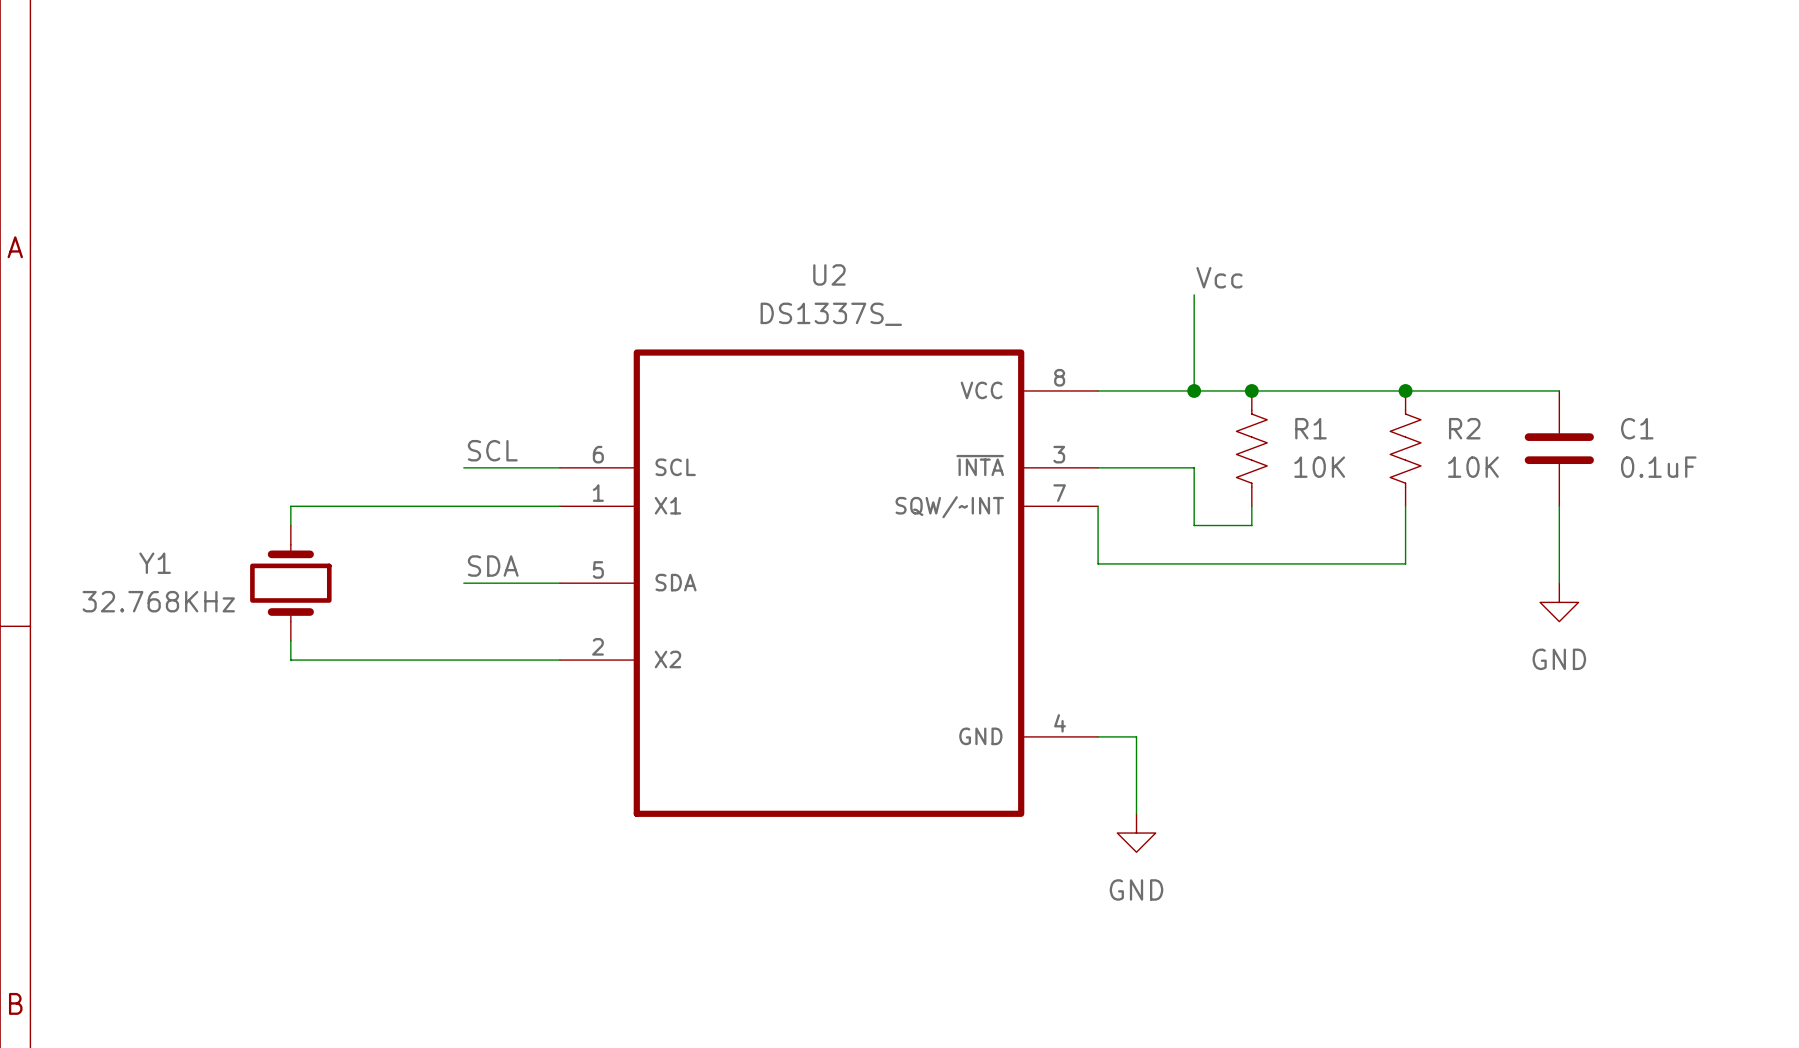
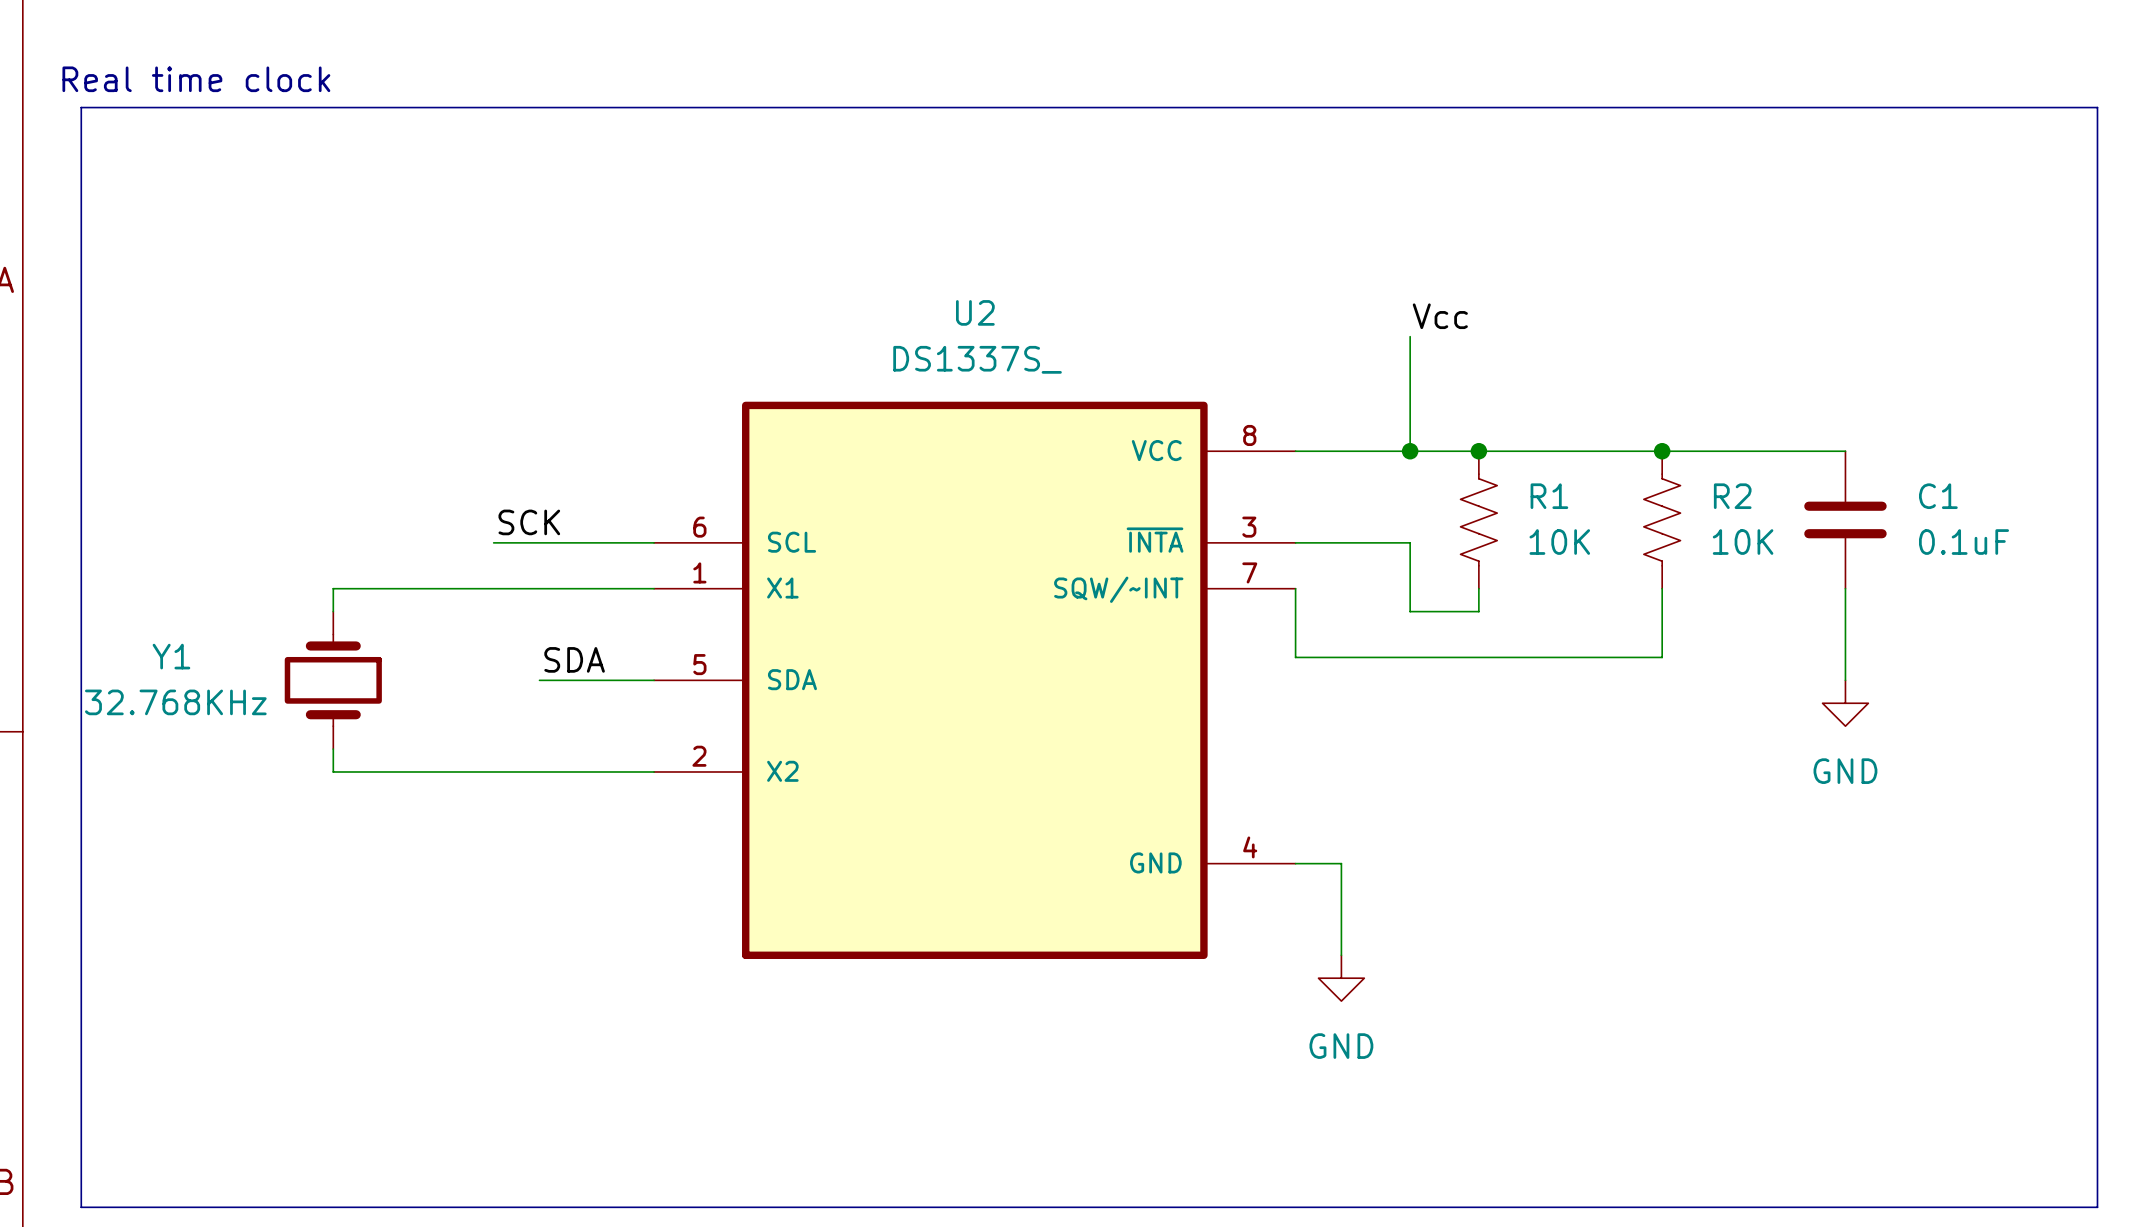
text: none -> Real time clock (196, 79)
line: none -> (81, 107) (2097, 107) (2097, 1207) (81, 1207) (81, 107)
label: SCL (492, 450) -> SCK (529, 522)
wire: none -> (493, 542) (539, 542)

